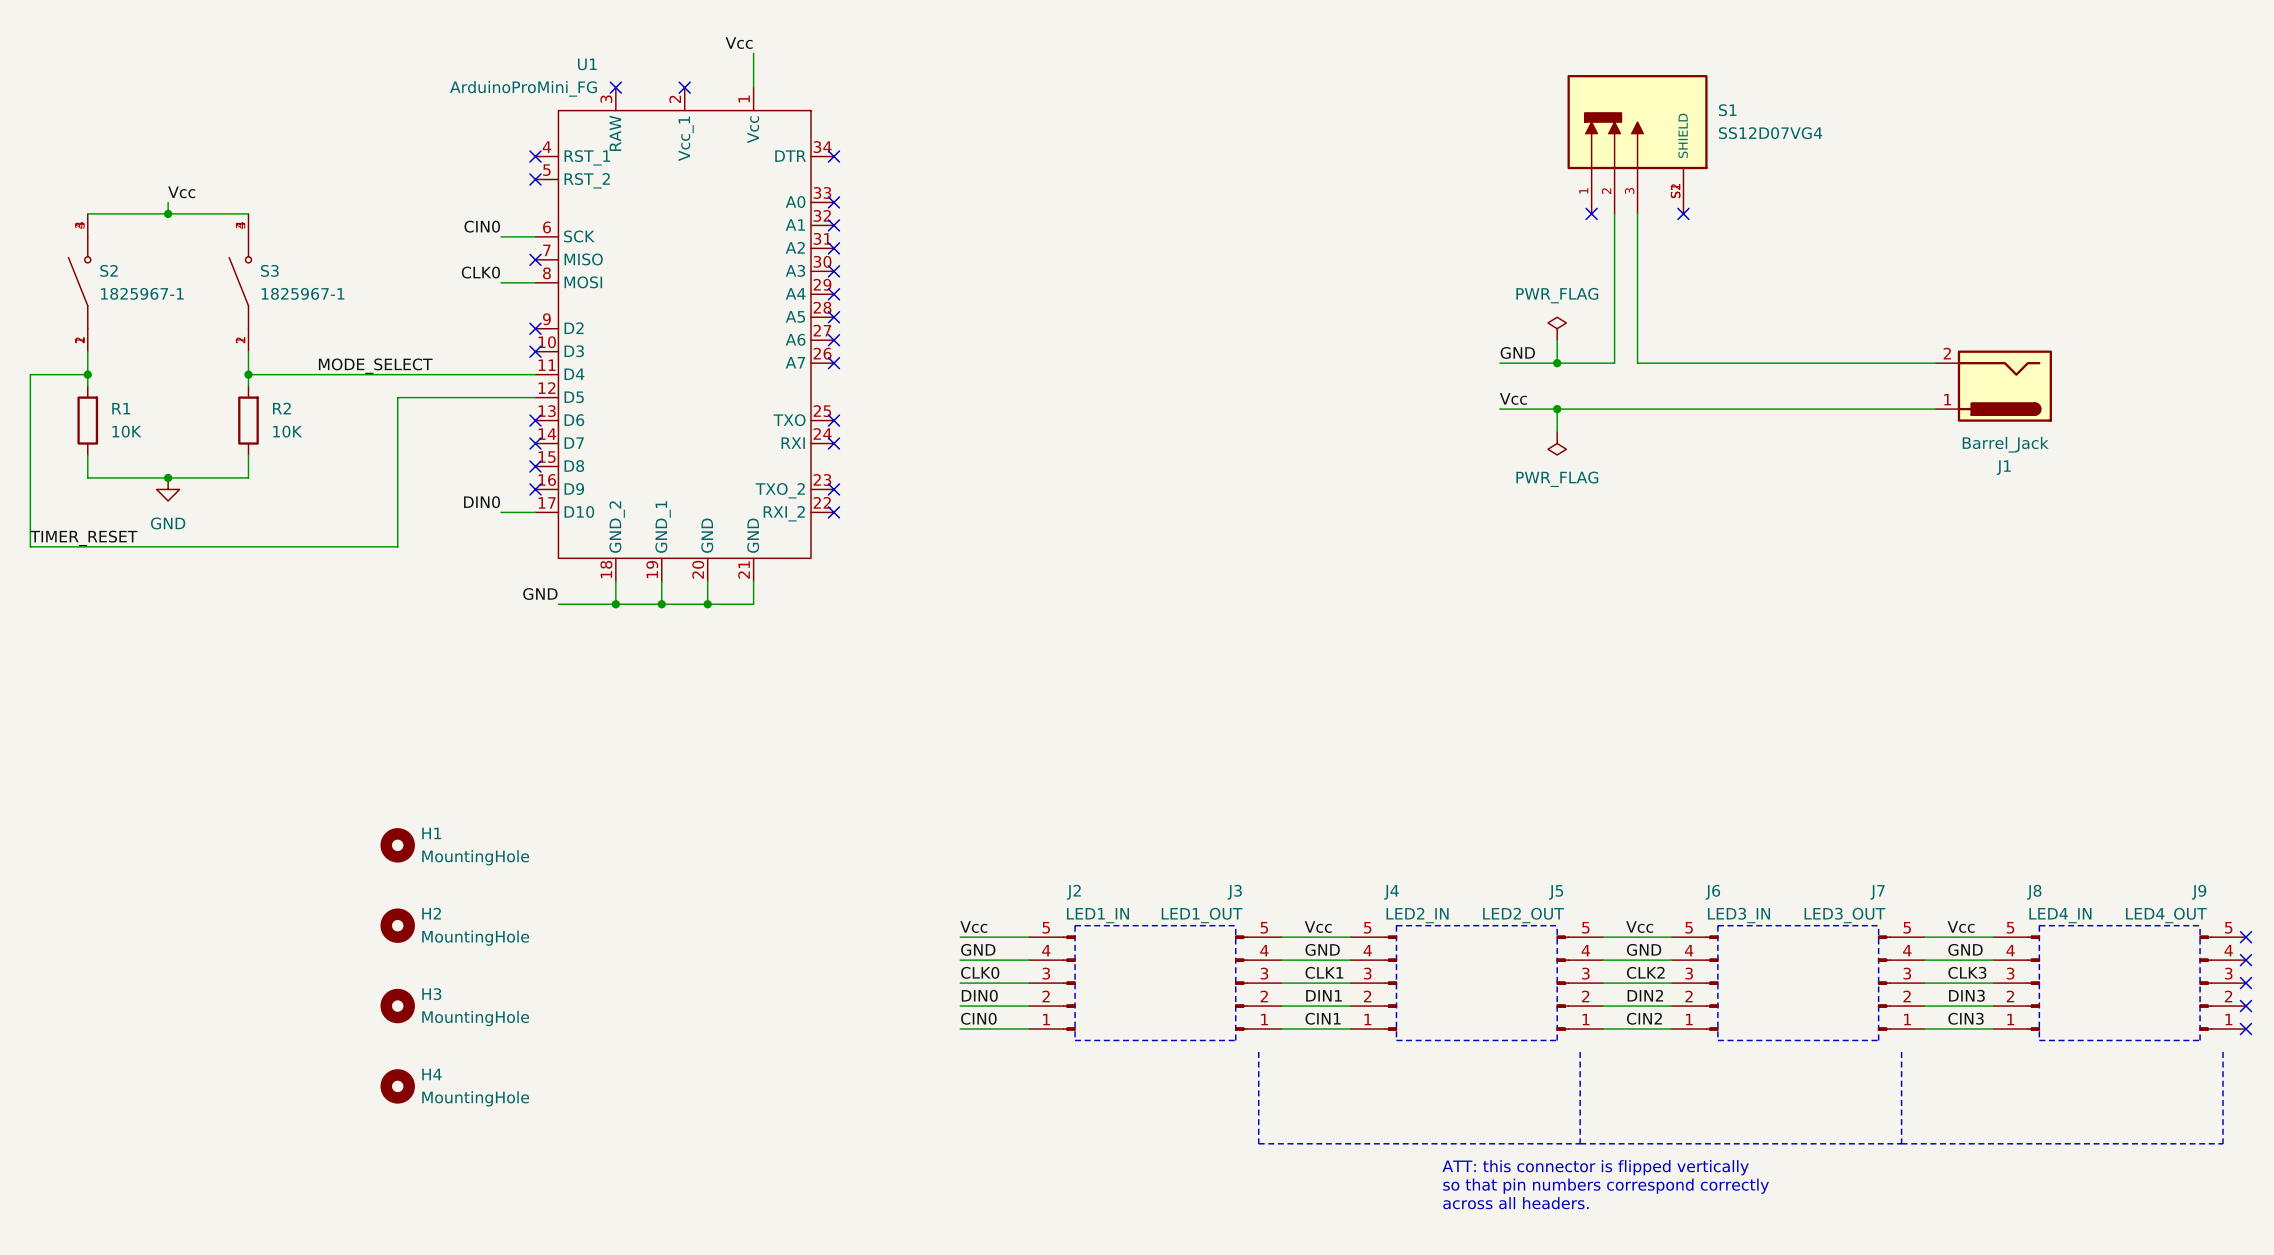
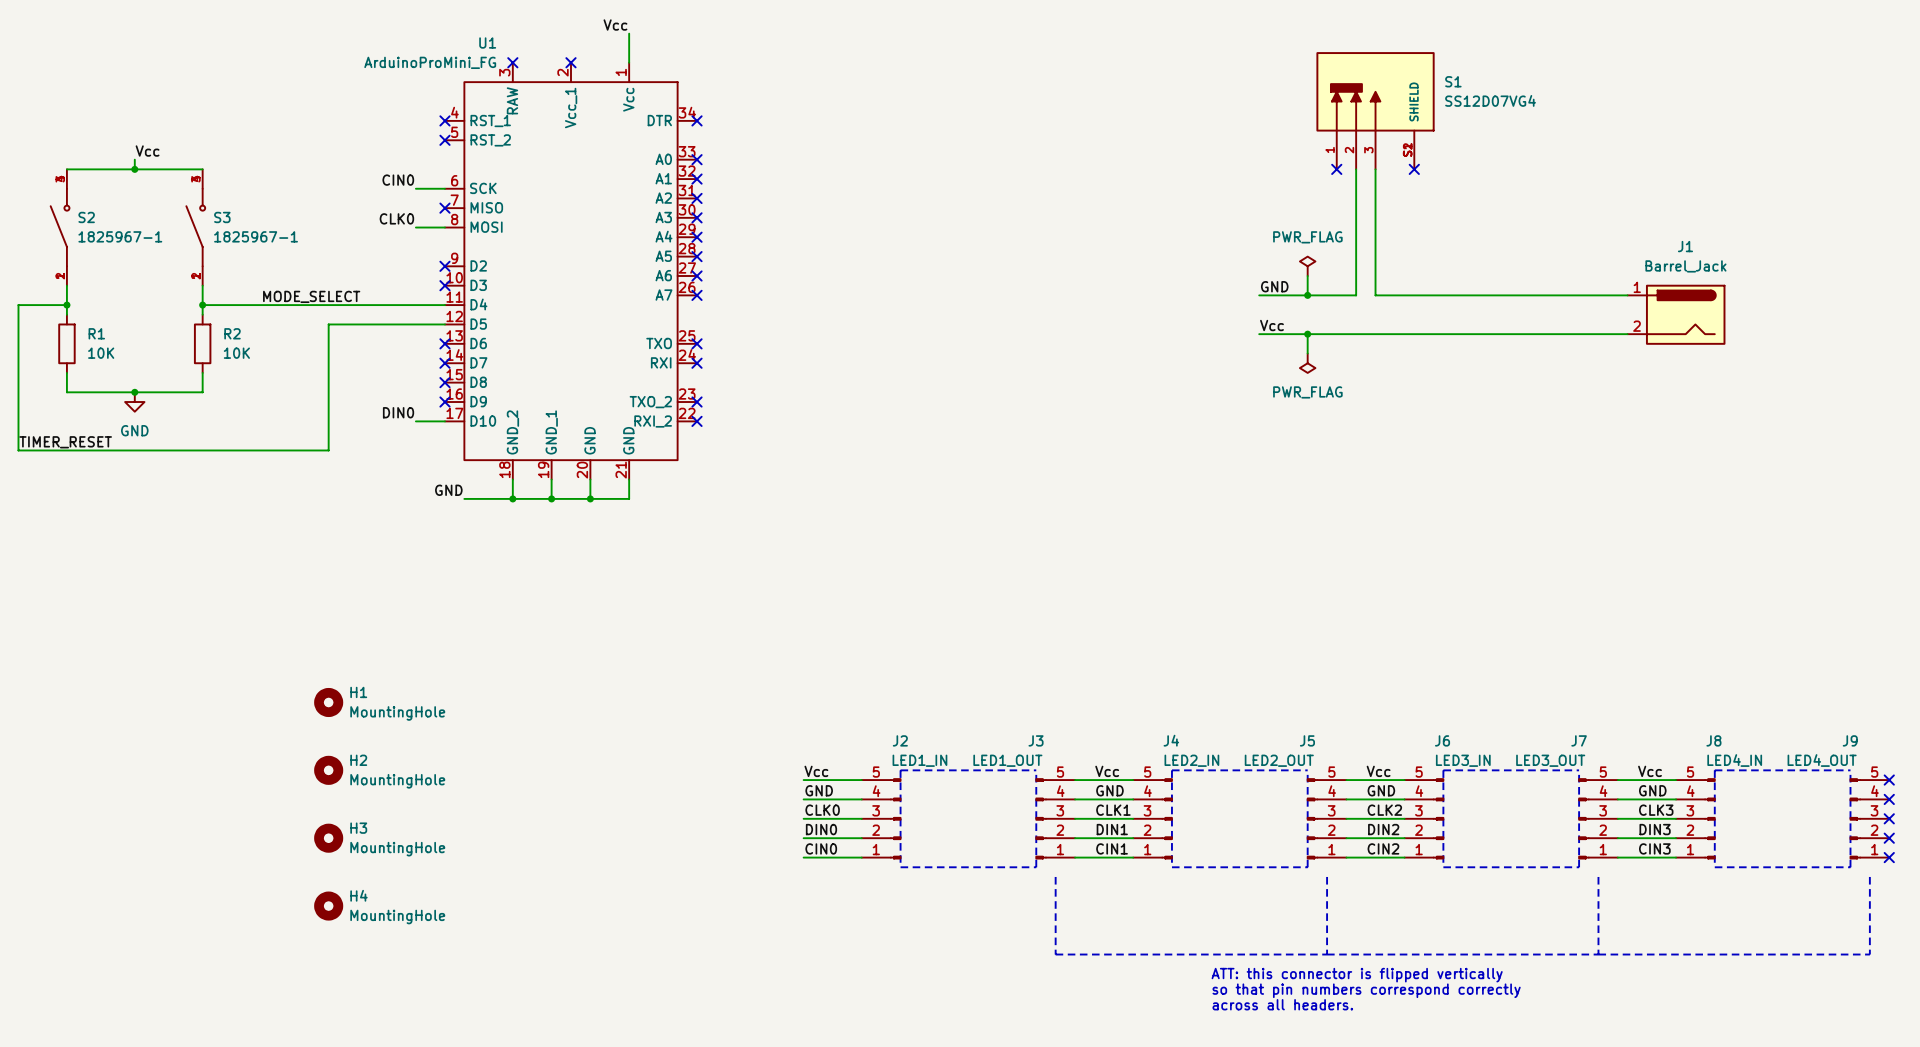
J1 flip: as is (2004, 386) -> up-down (1685, 314)

